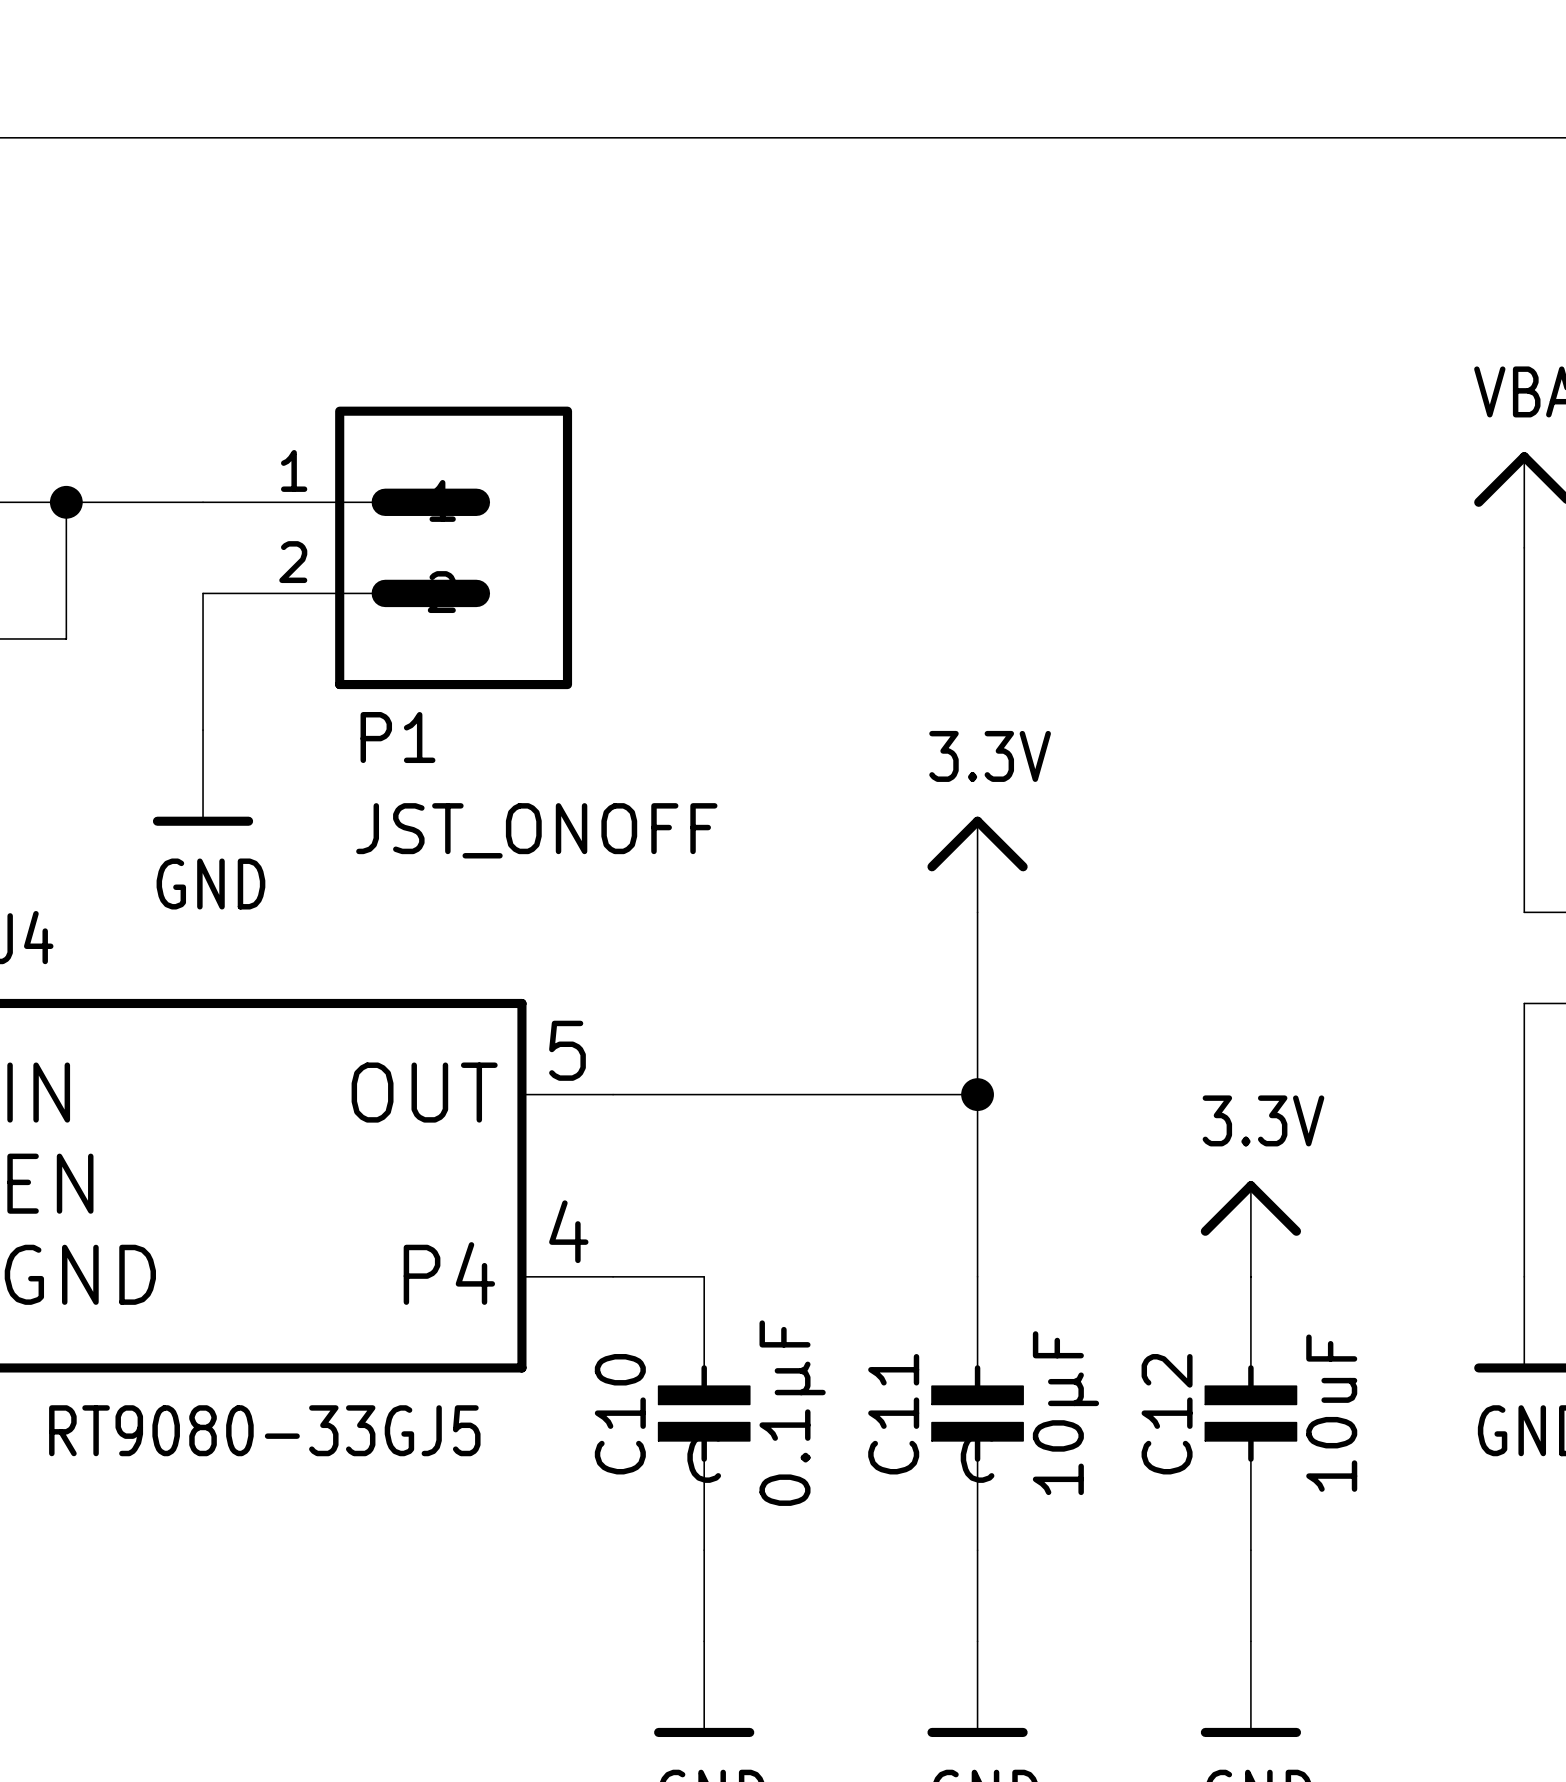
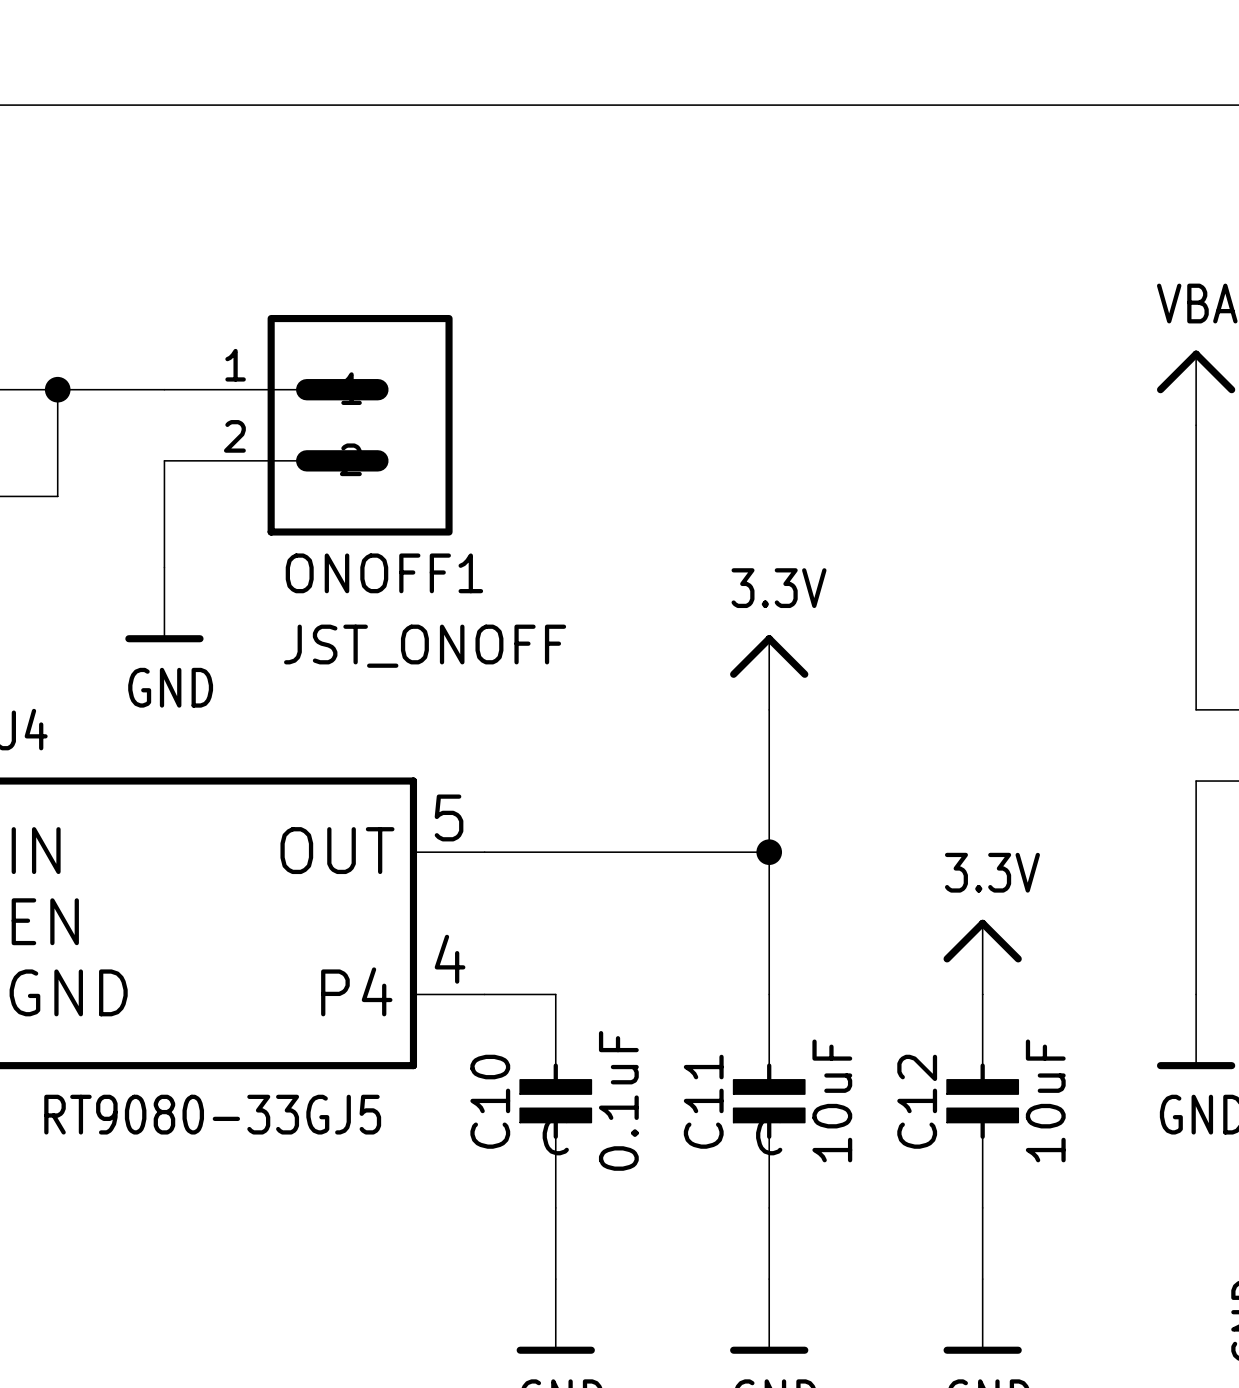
P1 name: P1 (397, 737) -> ONOFF1 (384, 573)
C10 value: 0.1µF (792, 1413) -> 0.1uF (618, 1100)
C11 value: 10µF (1065, 1413) -> 10uF (832, 1100)

